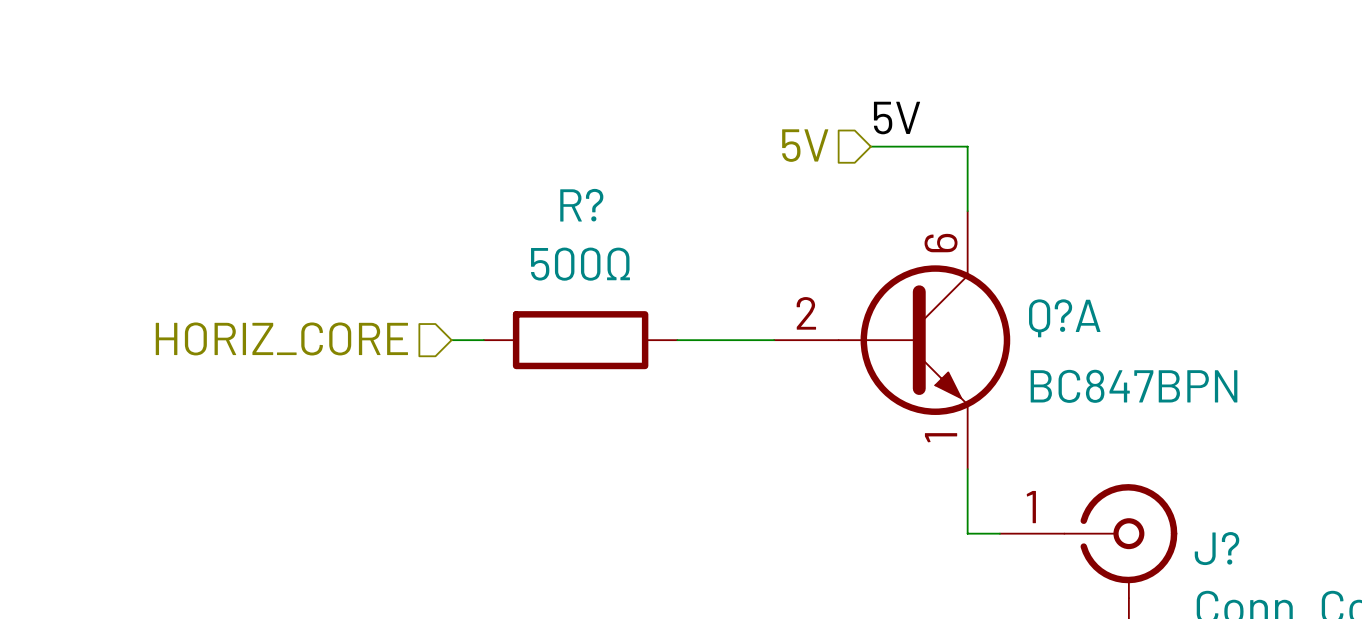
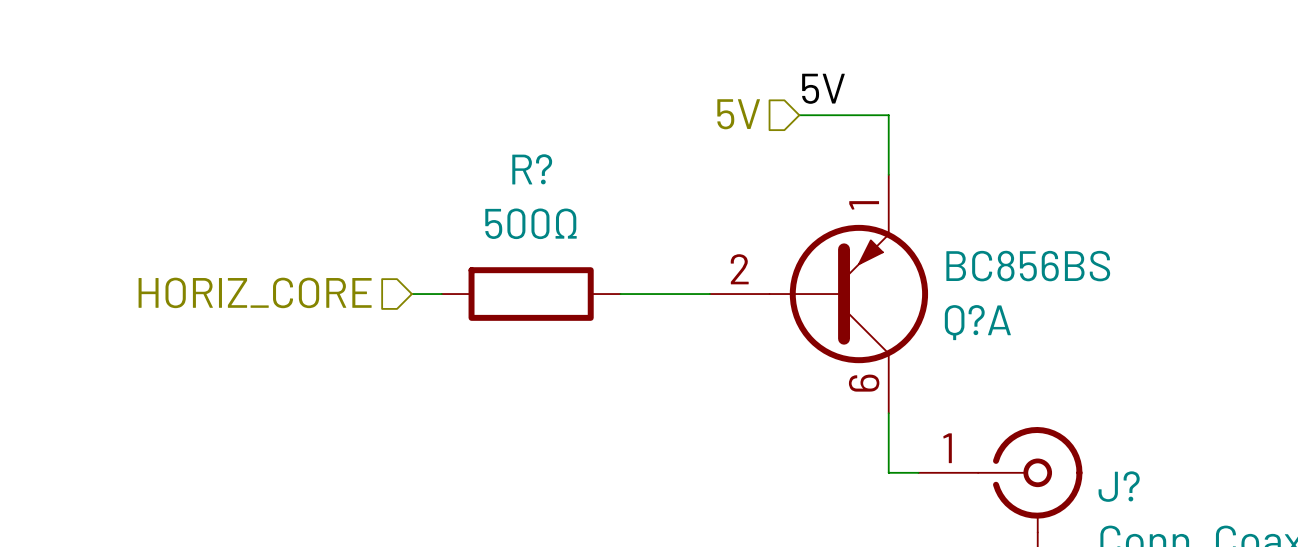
Q?A symbol: [774, 211, 1011, 470] -> [709, 174, 929, 414]
Q?A name position: Q?A (1064, 318) -> Q?A (977, 322)
Q?A value: BC847BPN (1134, 386) -> BC856BS (1028, 266)

